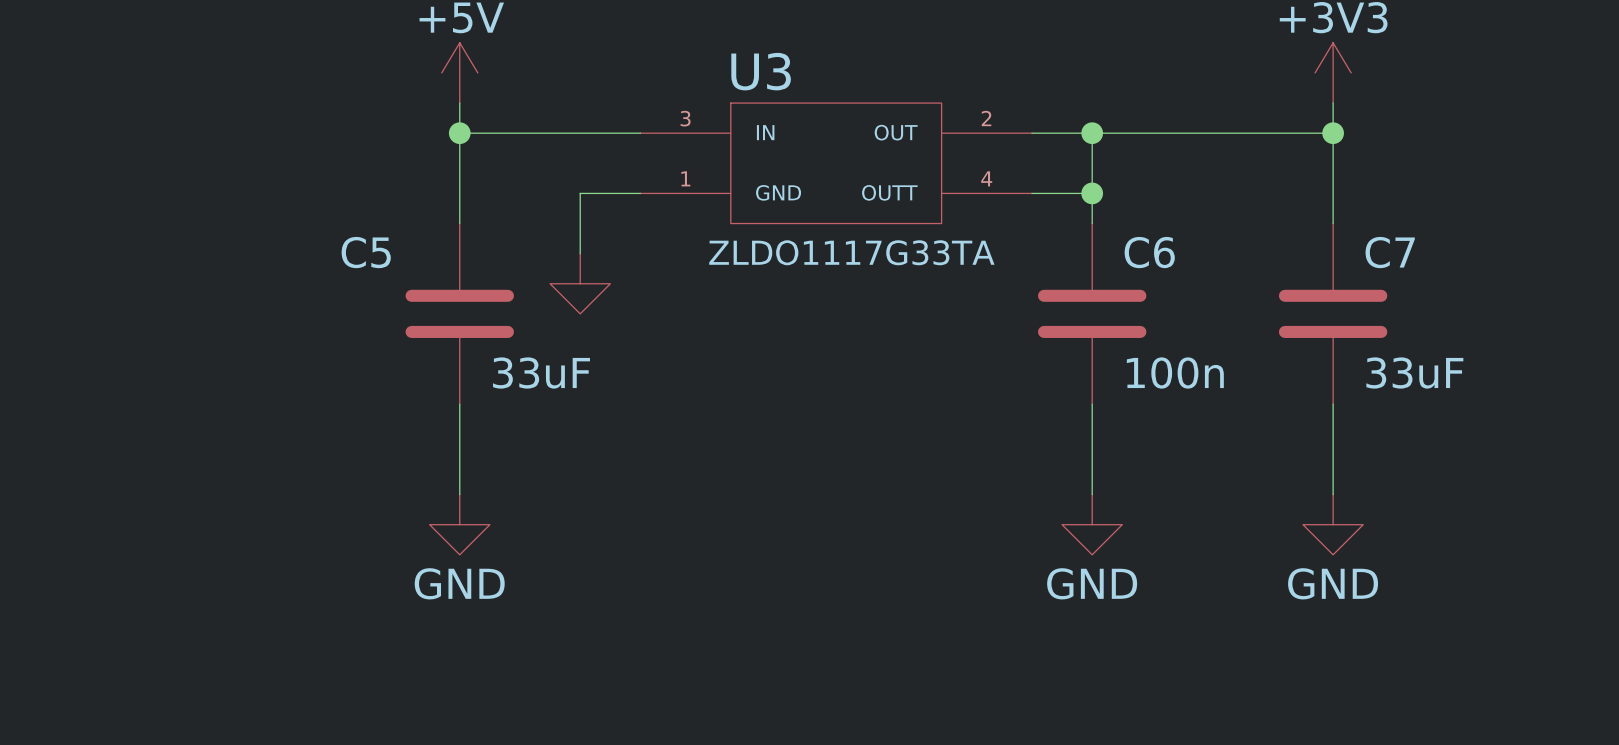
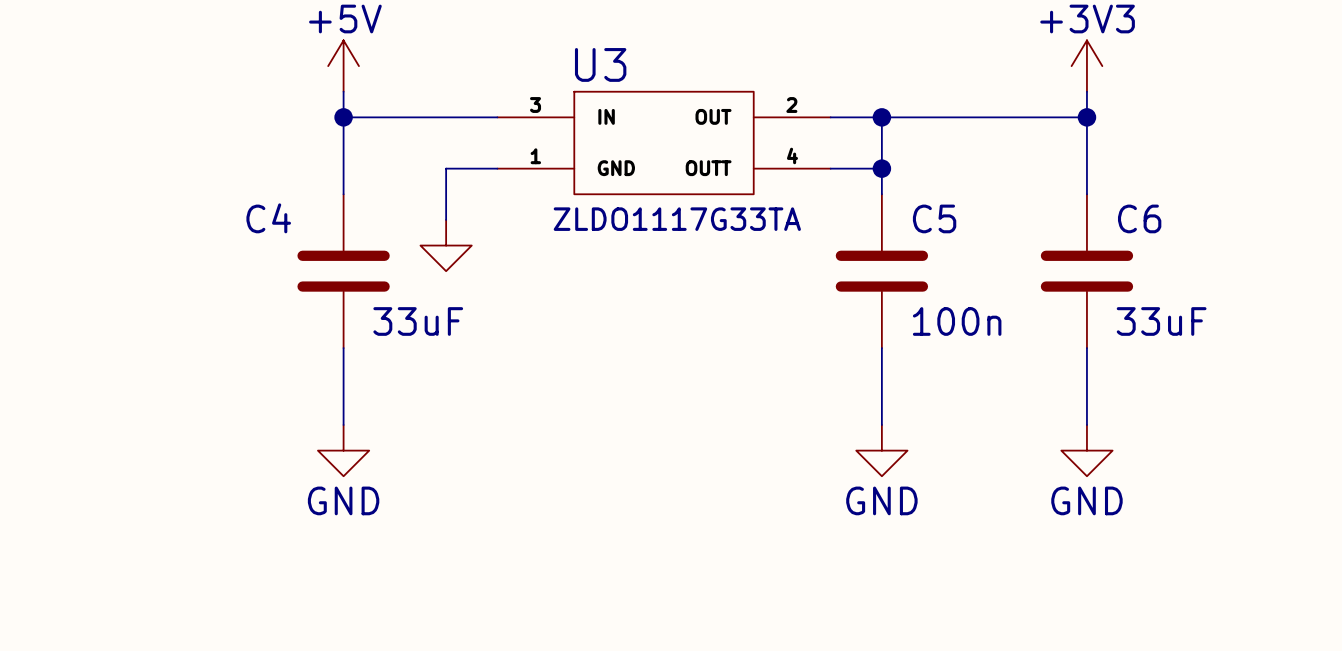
C5 name: C5 (366, 252) -> C4 (268, 218)
C6 name: C6 (1149, 252) -> C5 (934, 218)
C7 name: C7 (1390, 252) -> C6 (1139, 218)

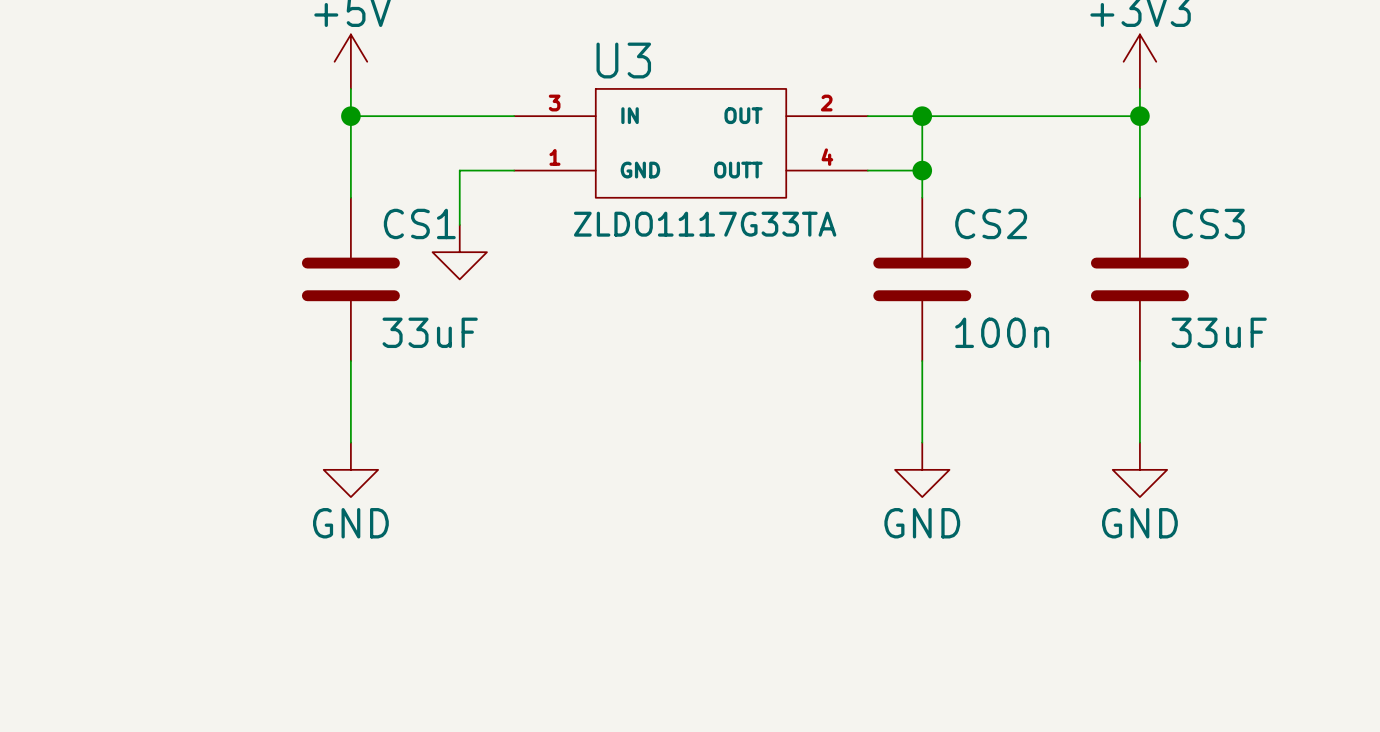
C4 name: C4 (268, 218) -> CS1 (419, 223)
C5 name: C5 (934, 218) -> CS2 (991, 223)
C6 name: C6 (1139, 218) -> CS3 (1208, 223)

